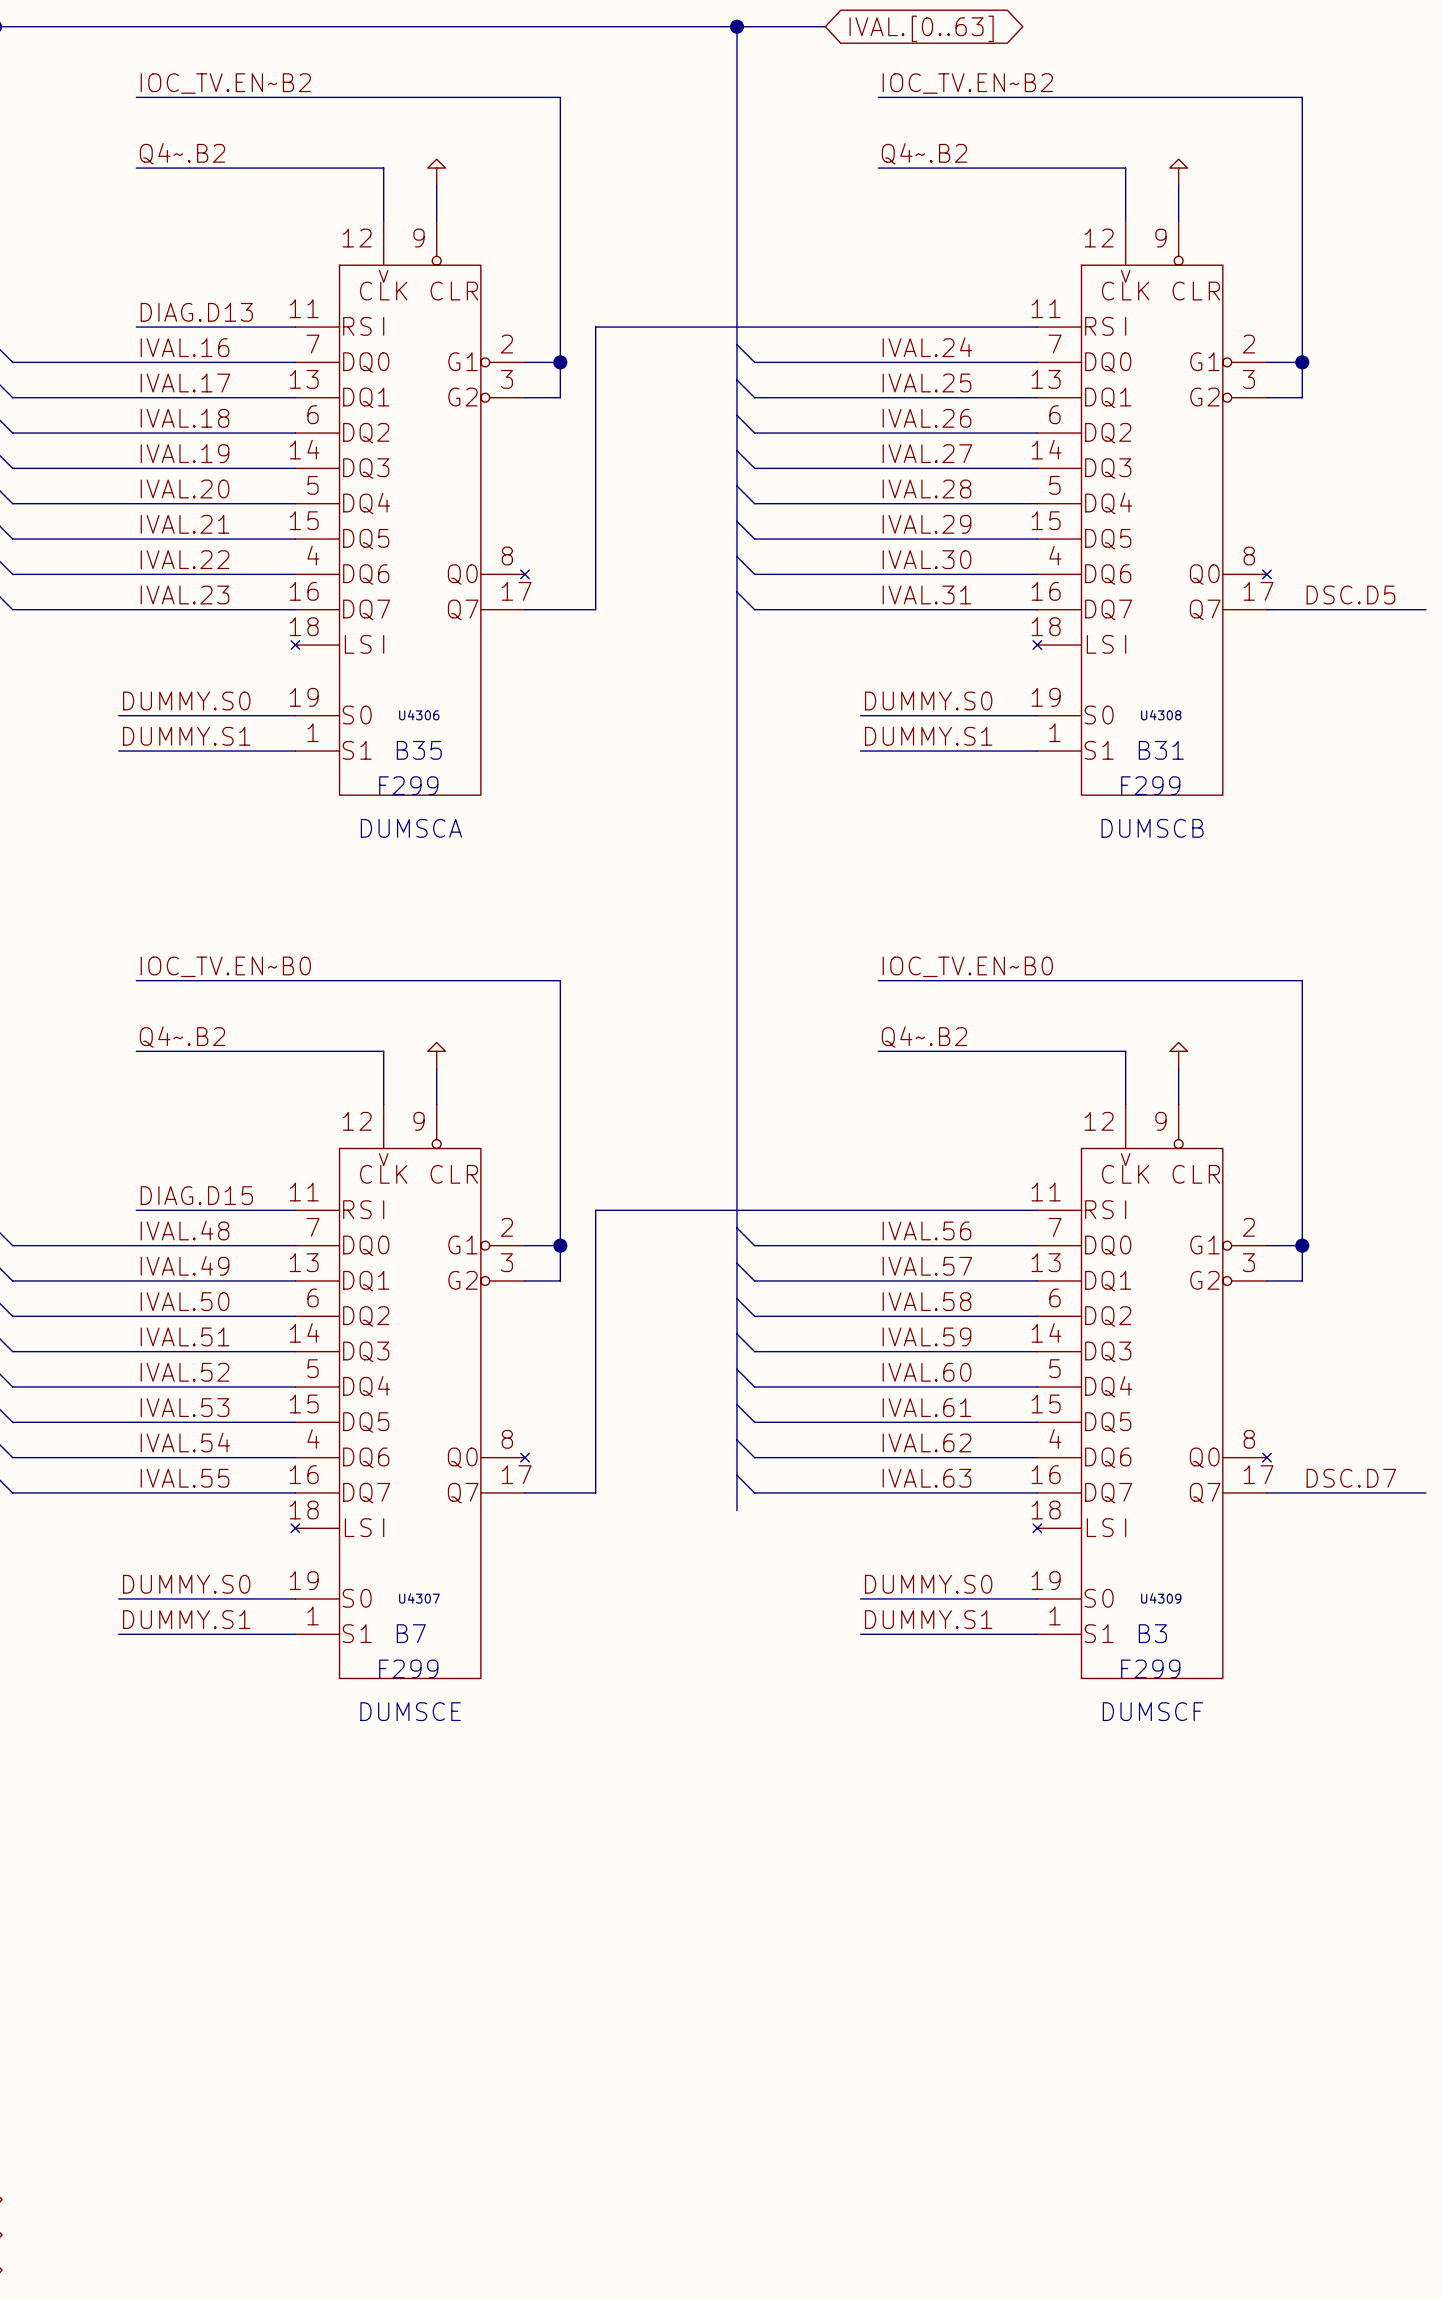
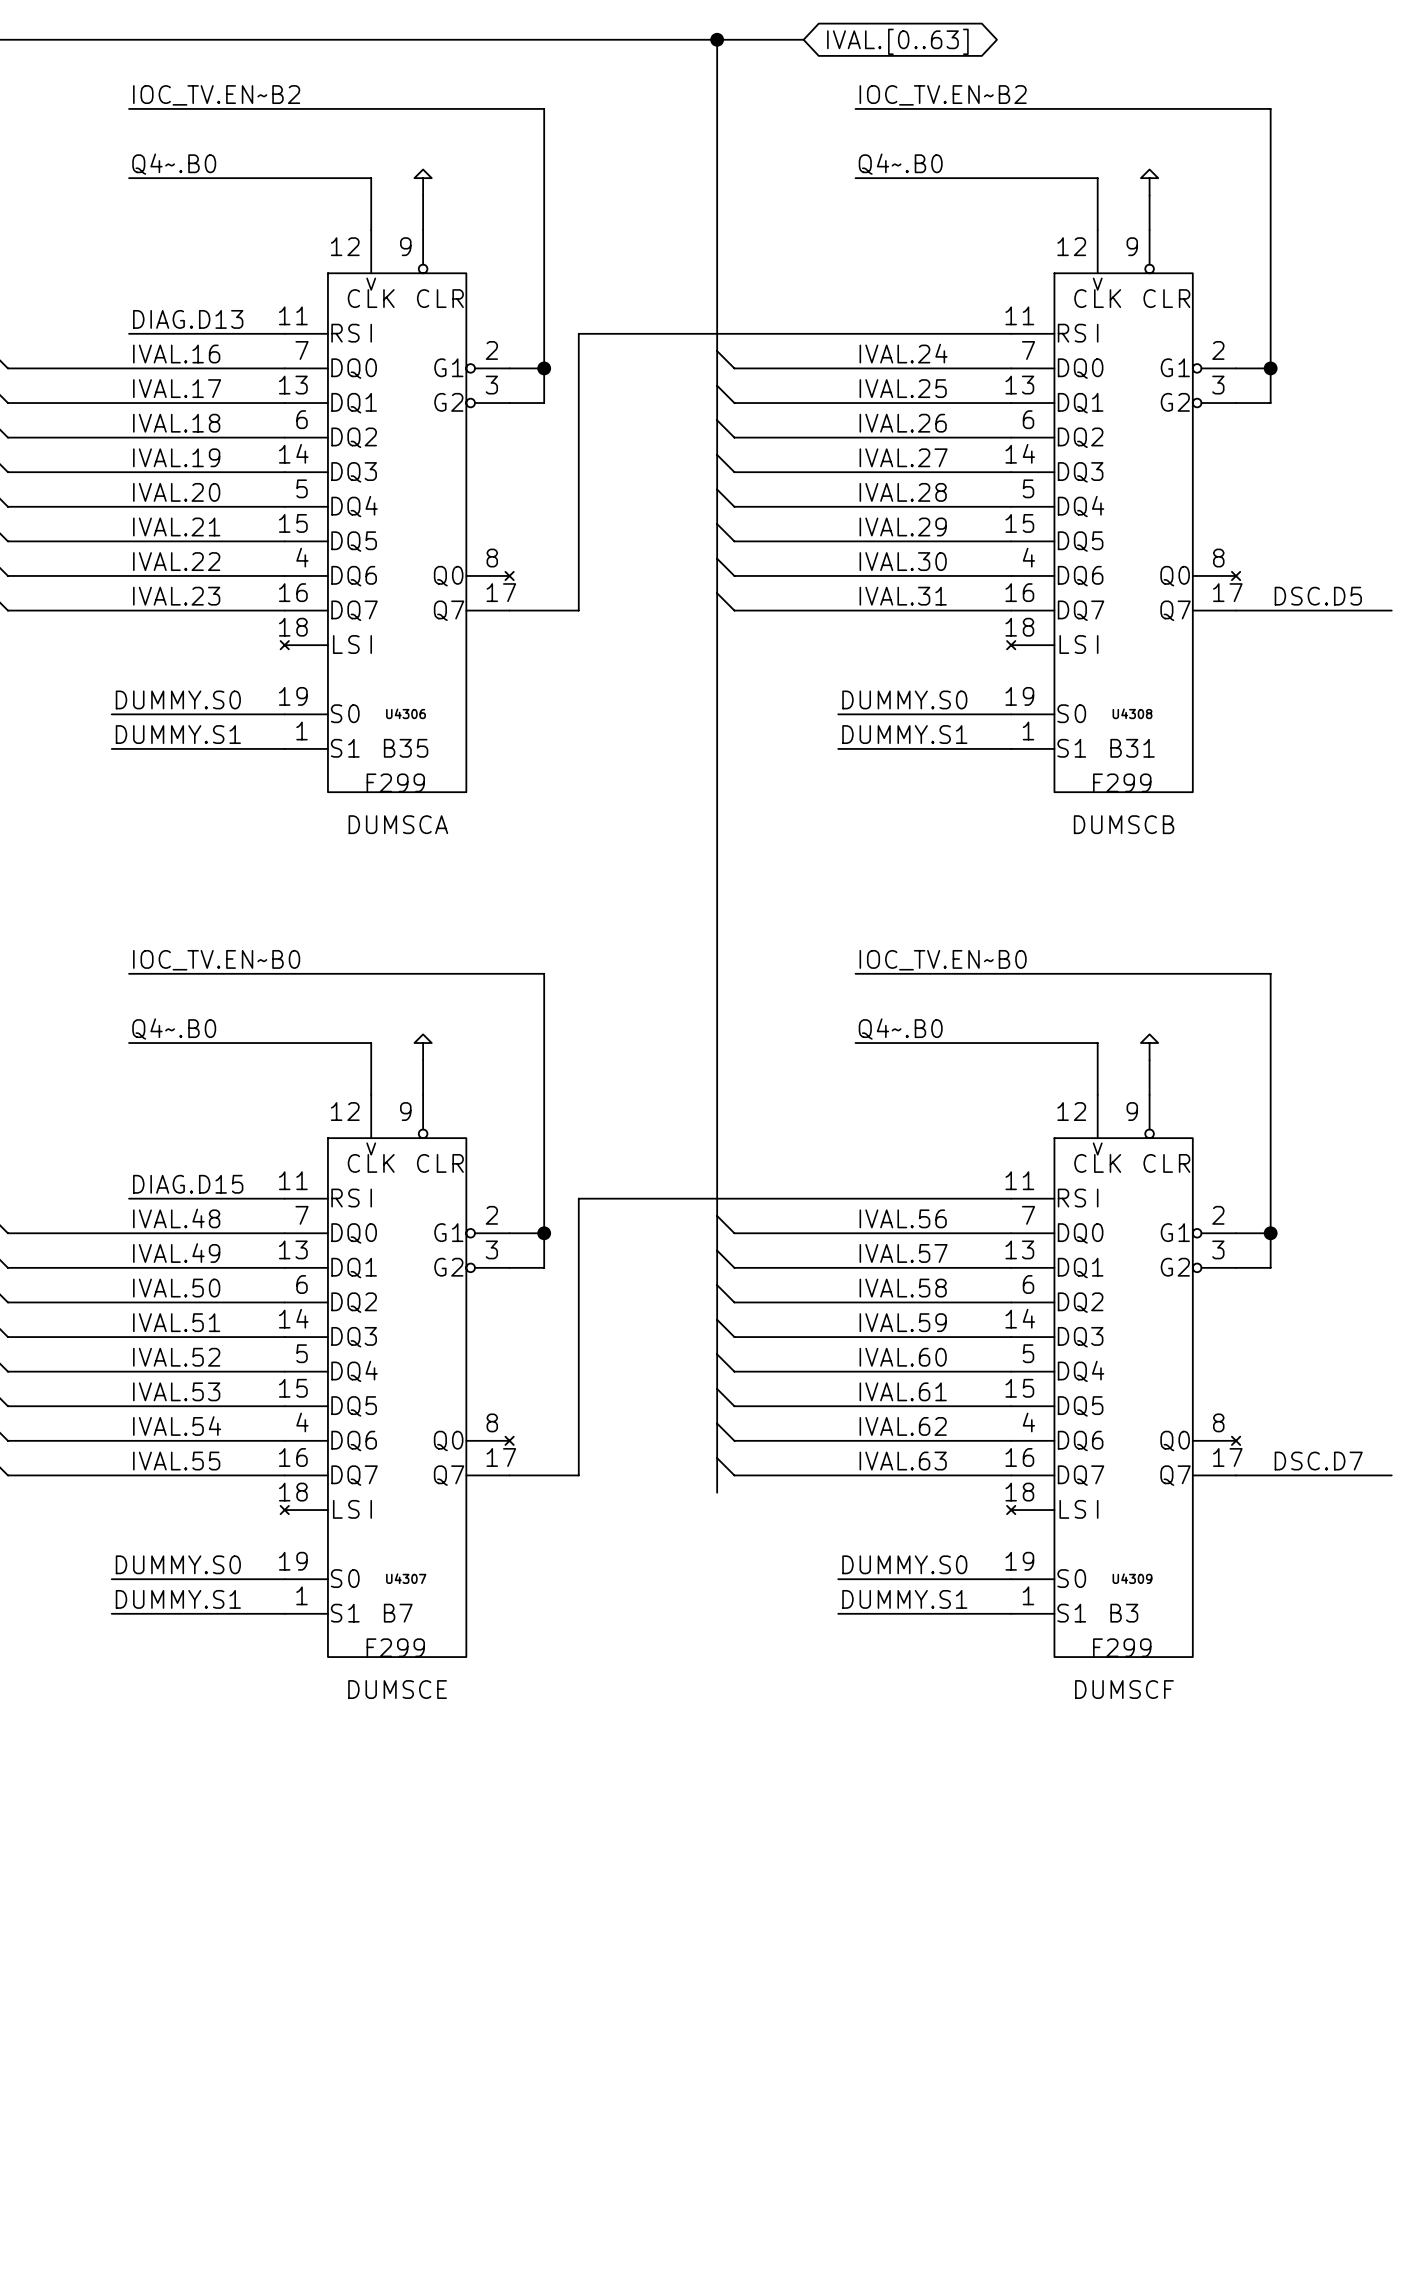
label: Q4~.B2 (182, 153) -> Q4~.B0 (174, 164)
label: Q4~.B2 (924, 153) -> Q4~.B0 (900, 164)
label: Q4~.B2 (182, 1037) -> Q4~.B0 (174, 1029)
label: Q4~.B2 (924, 1037) -> Q4~.B0 (900, 1029)

